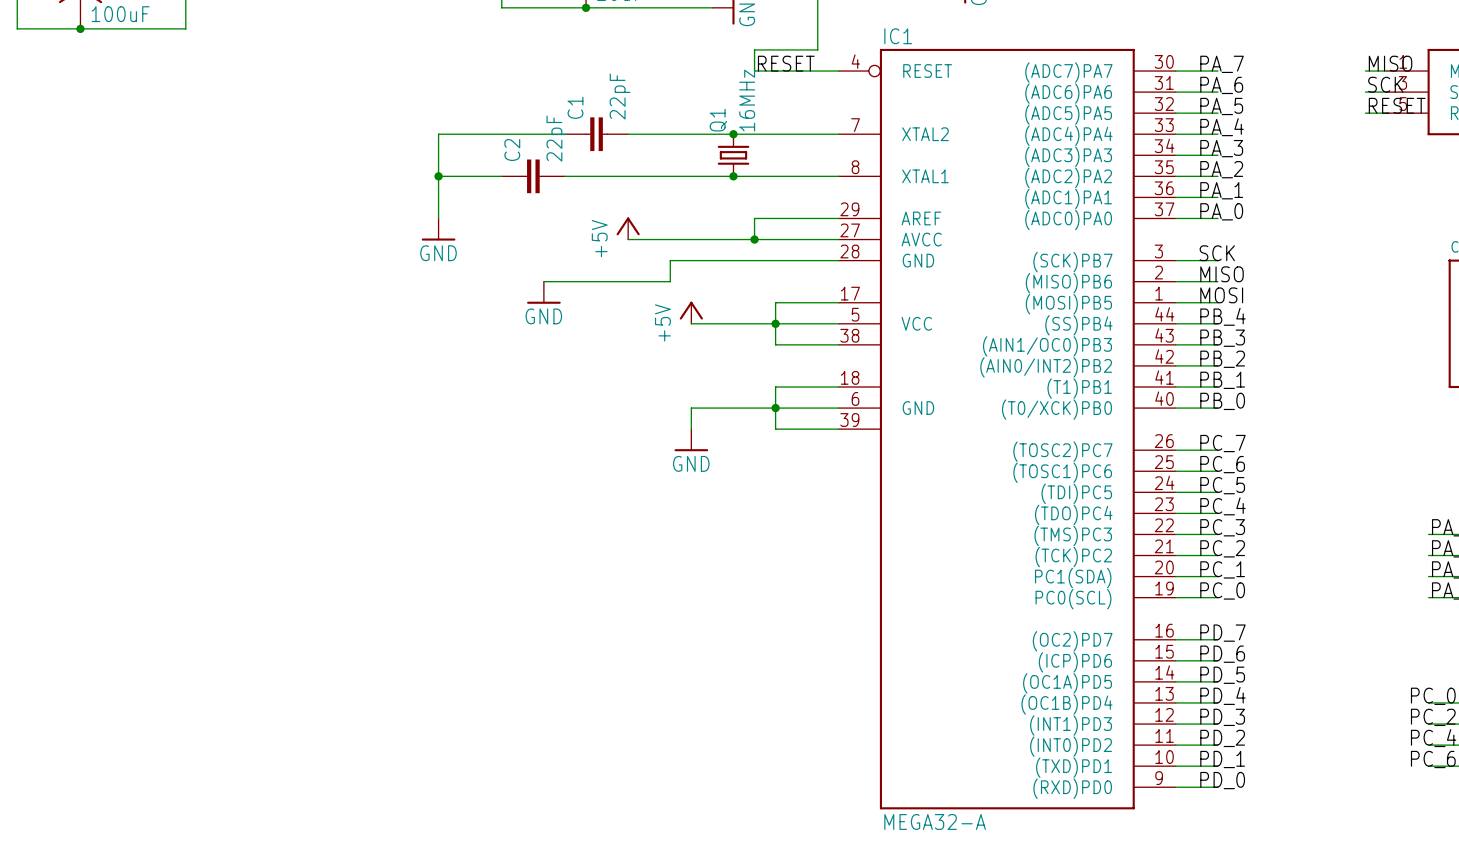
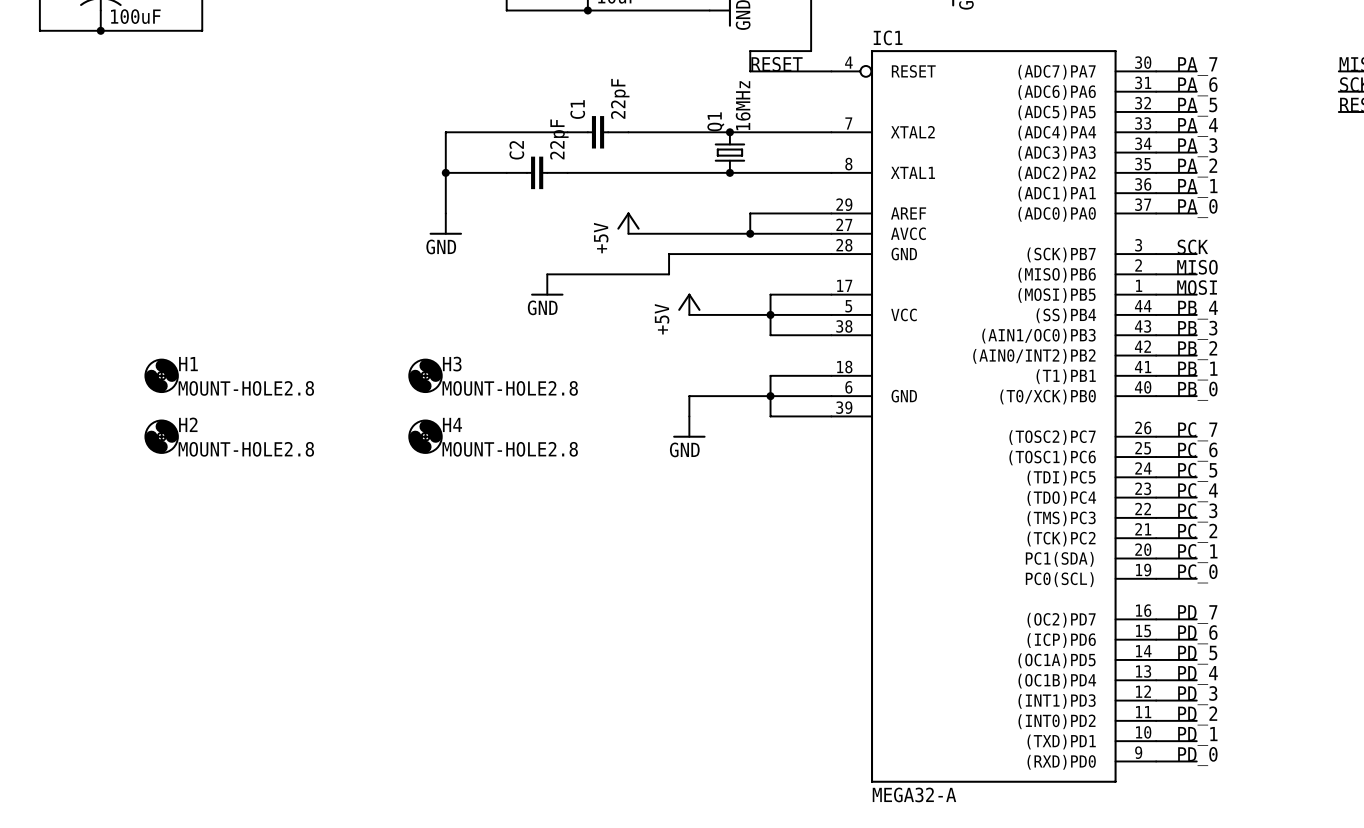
H1: none -> MOUNT-HOLE2.8 (161, 375)
H3: none -> MOUNT-HOLE2.8 (425, 375)
H2: none -> MOUNT-HOLE2.8 (161, 436)
H4: none -> MOUNT-HOLE2.8 (425, 436)

